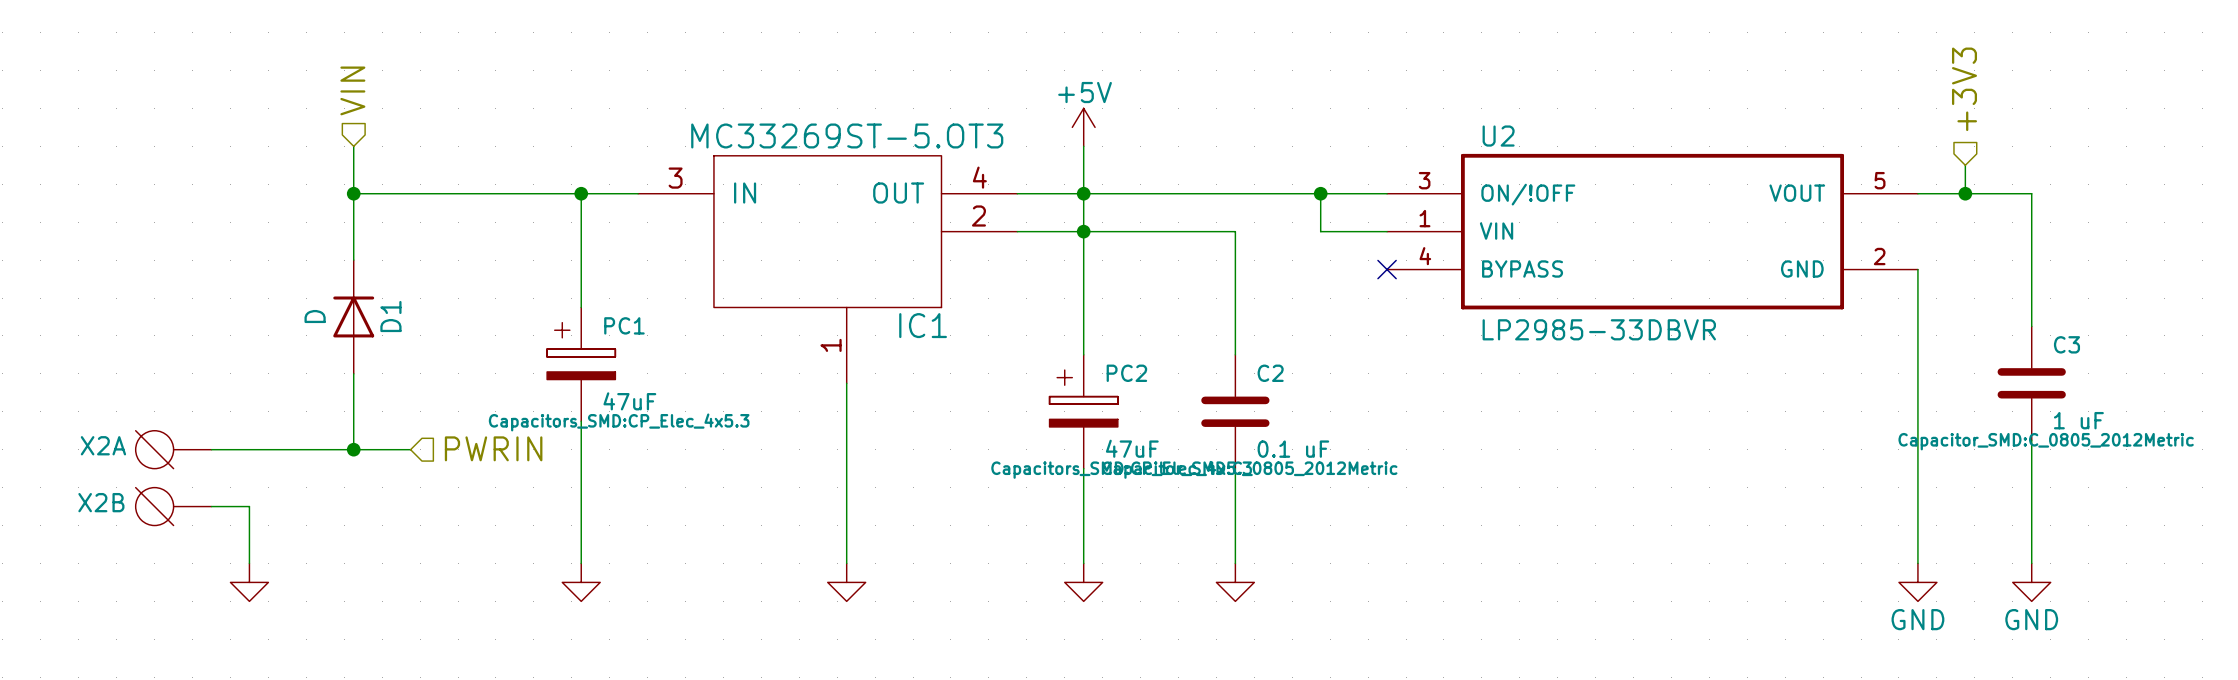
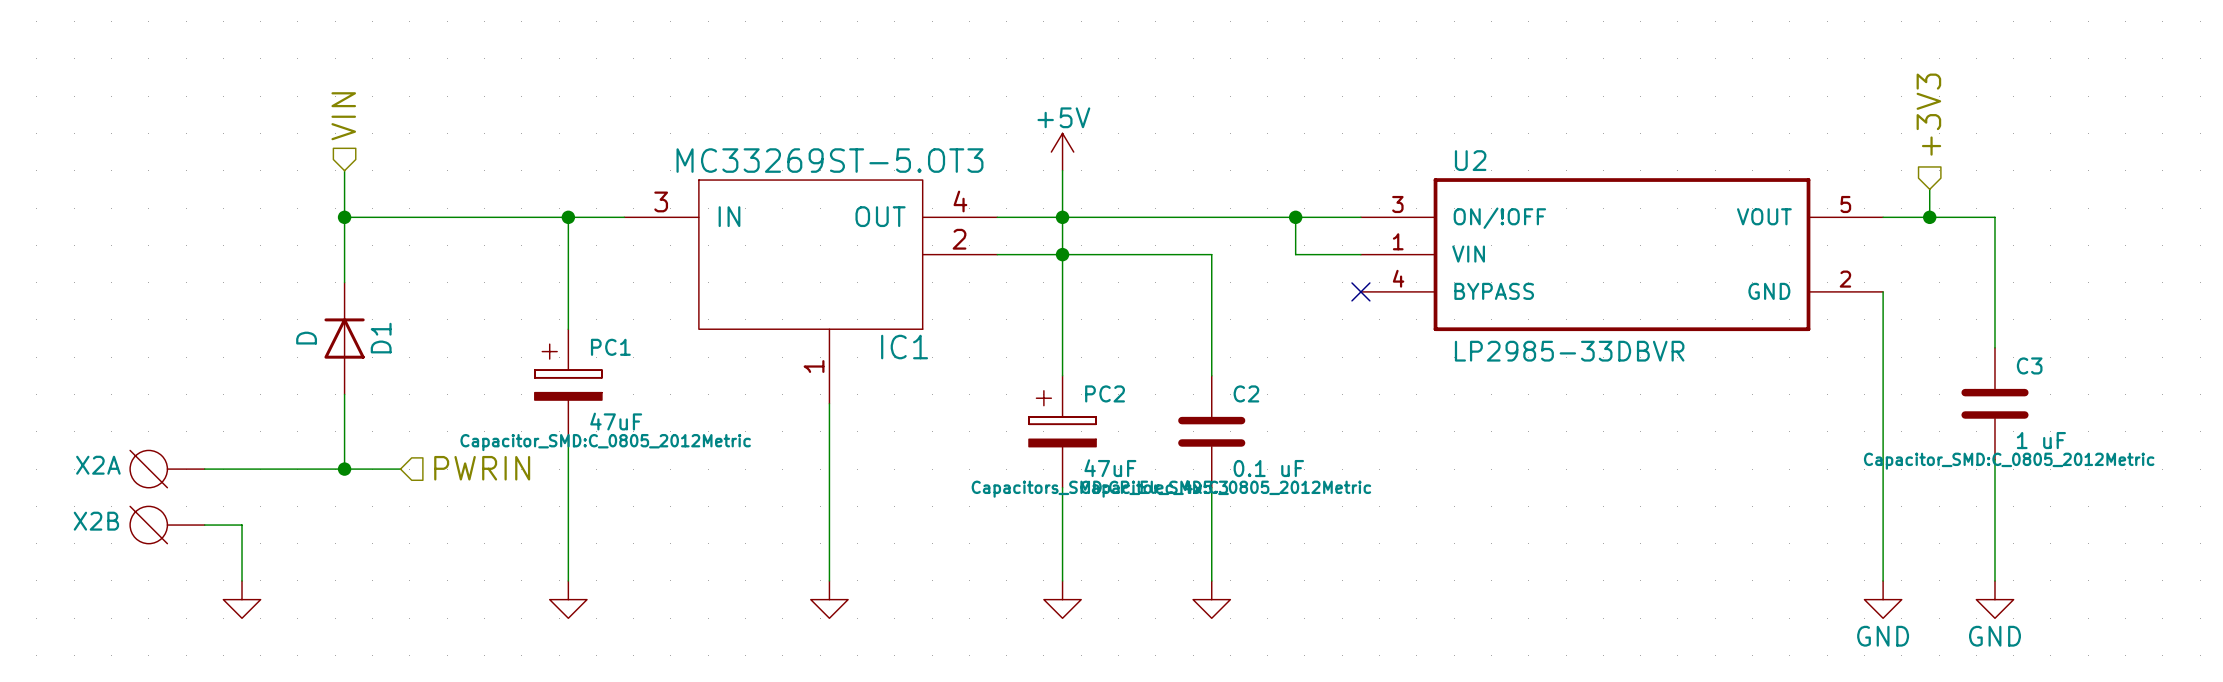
PC1 text: Capacitors_SMD:CP_Elec_4x5.3 (619, 422) -> Capacitor_SMD:C_0805_2012Metric (605, 442)

